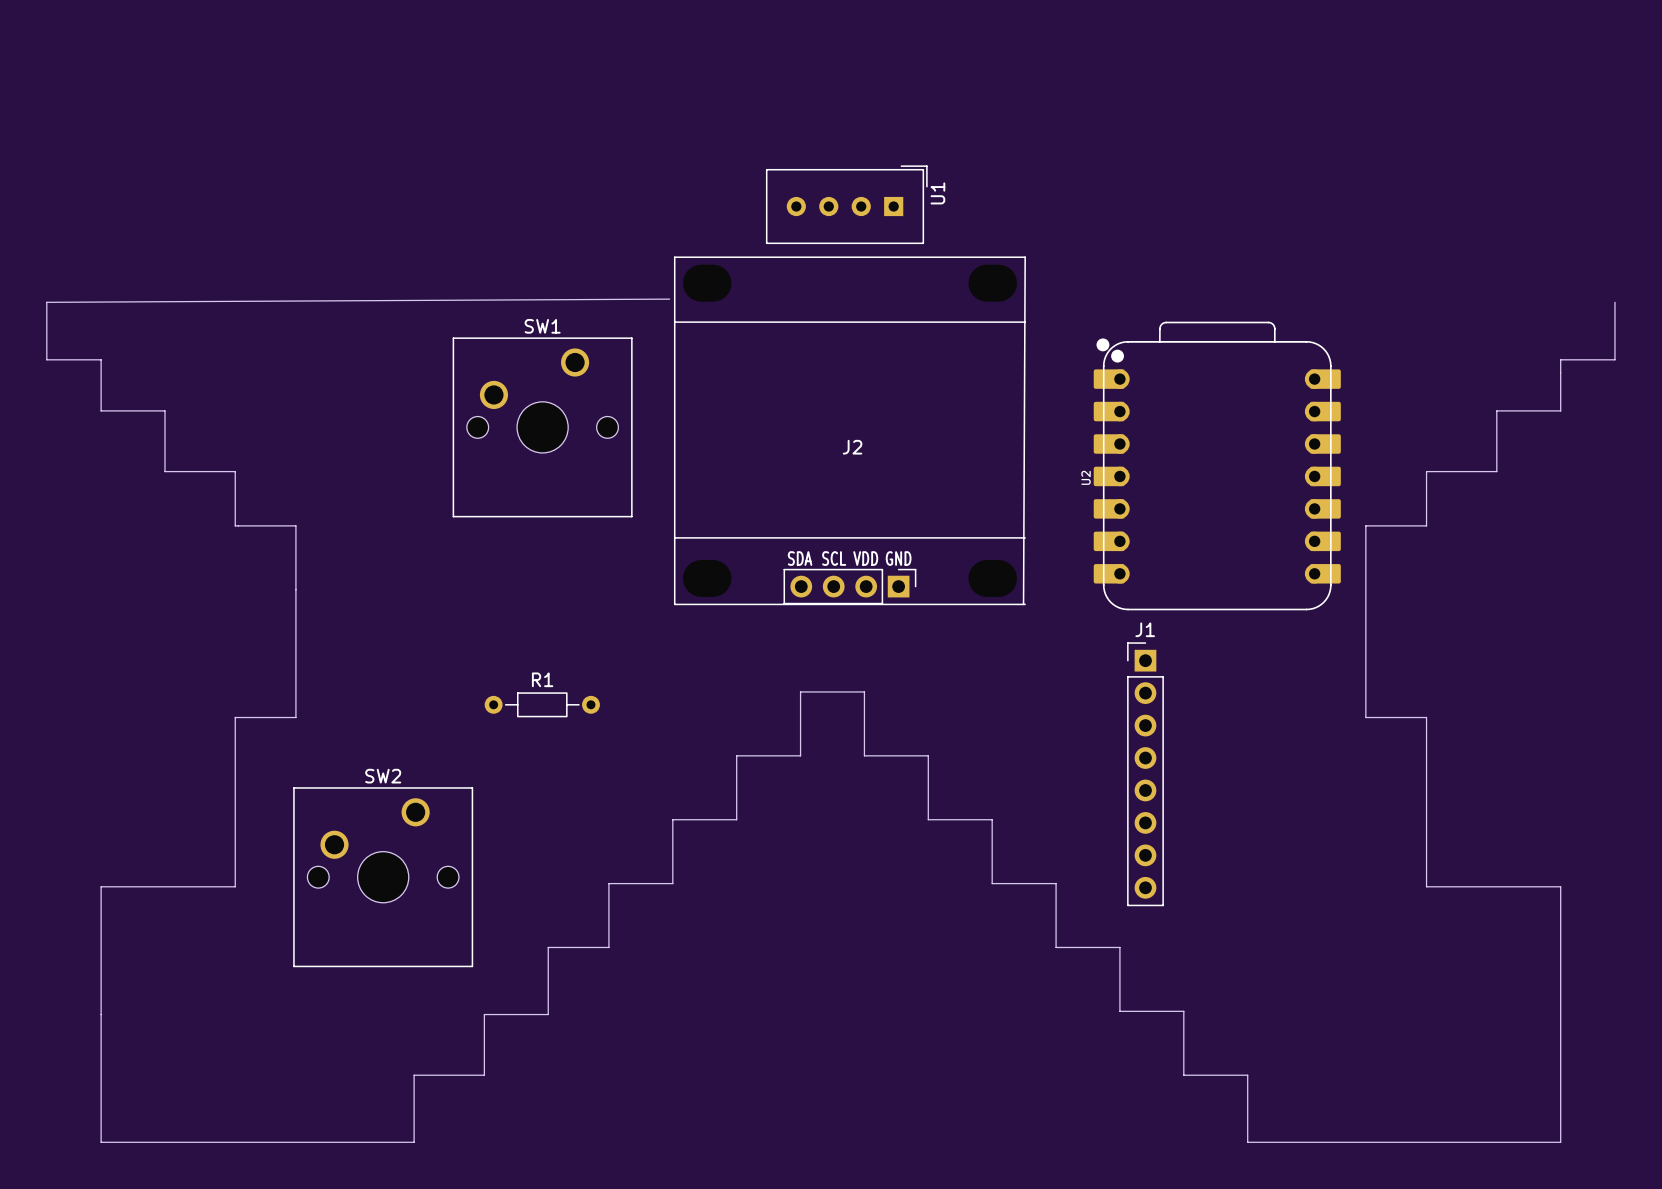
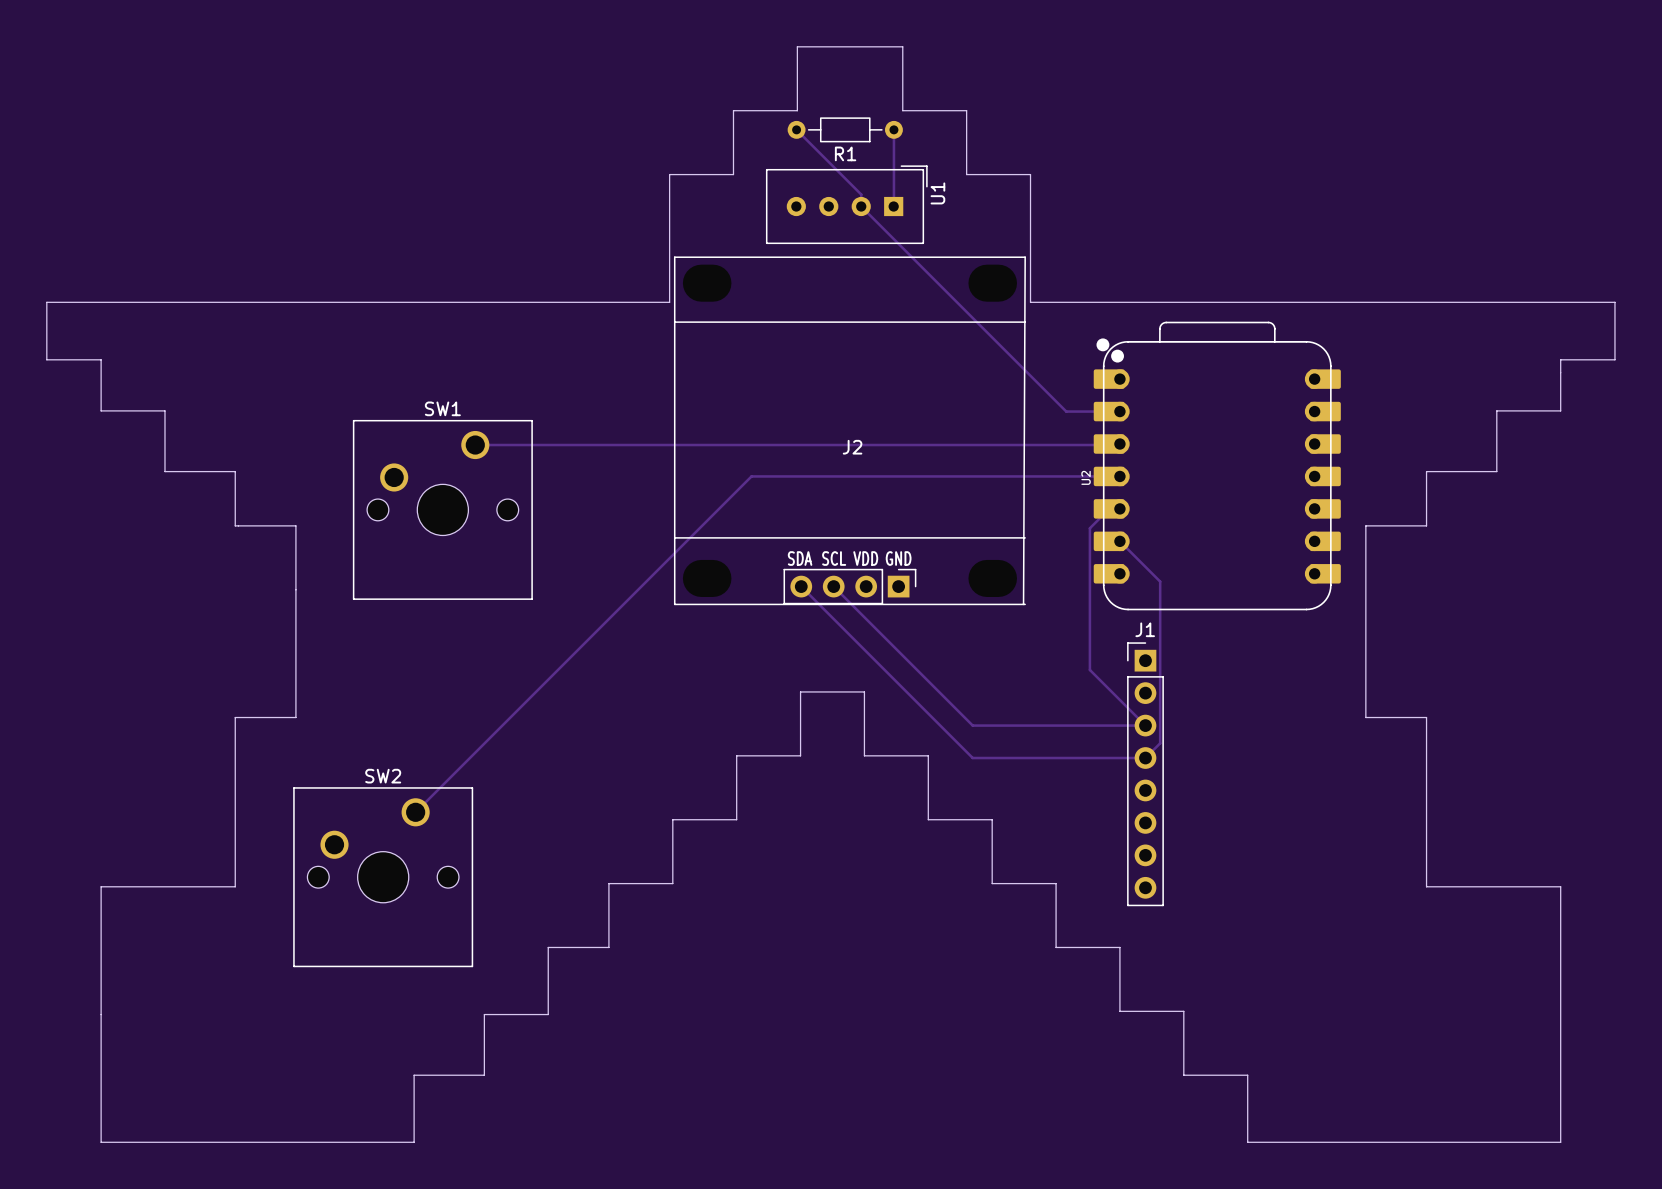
track: none -> (796, 129) (861, 194) (861, 206) (1066, 411) (1109, 411)
track: none -> (893, 129) (893, 206)
board edge: (669, 299) (46, 302) -> (1614, 302) (1030, 302) (1030, 174) (966, 174) (966, 110) (902, 110) (902, 46) (797, 46) (797, 110) (733, 110) (733, 174) (669, 174) (669, 302) (46, 302)
SW1 position: (542, 427) -> (442, 509)
track: none -> (1109, 444) (475, 445)
track: none -> (1109, 476) (751, 476) (415, 812)
track: none -> (1119, 508) (1109, 508) (1089, 528) (1089, 669) (1145, 725) (972, 725) (833, 586)
track: none -> (1119, 541) (1160, 581) (1160, 743) (1145, 758) (972, 758) (801, 586)
R1 name position: R1 (542, 679) -> R1 (845, 153)
R1 position: (542, 704) -> (845, 129)

